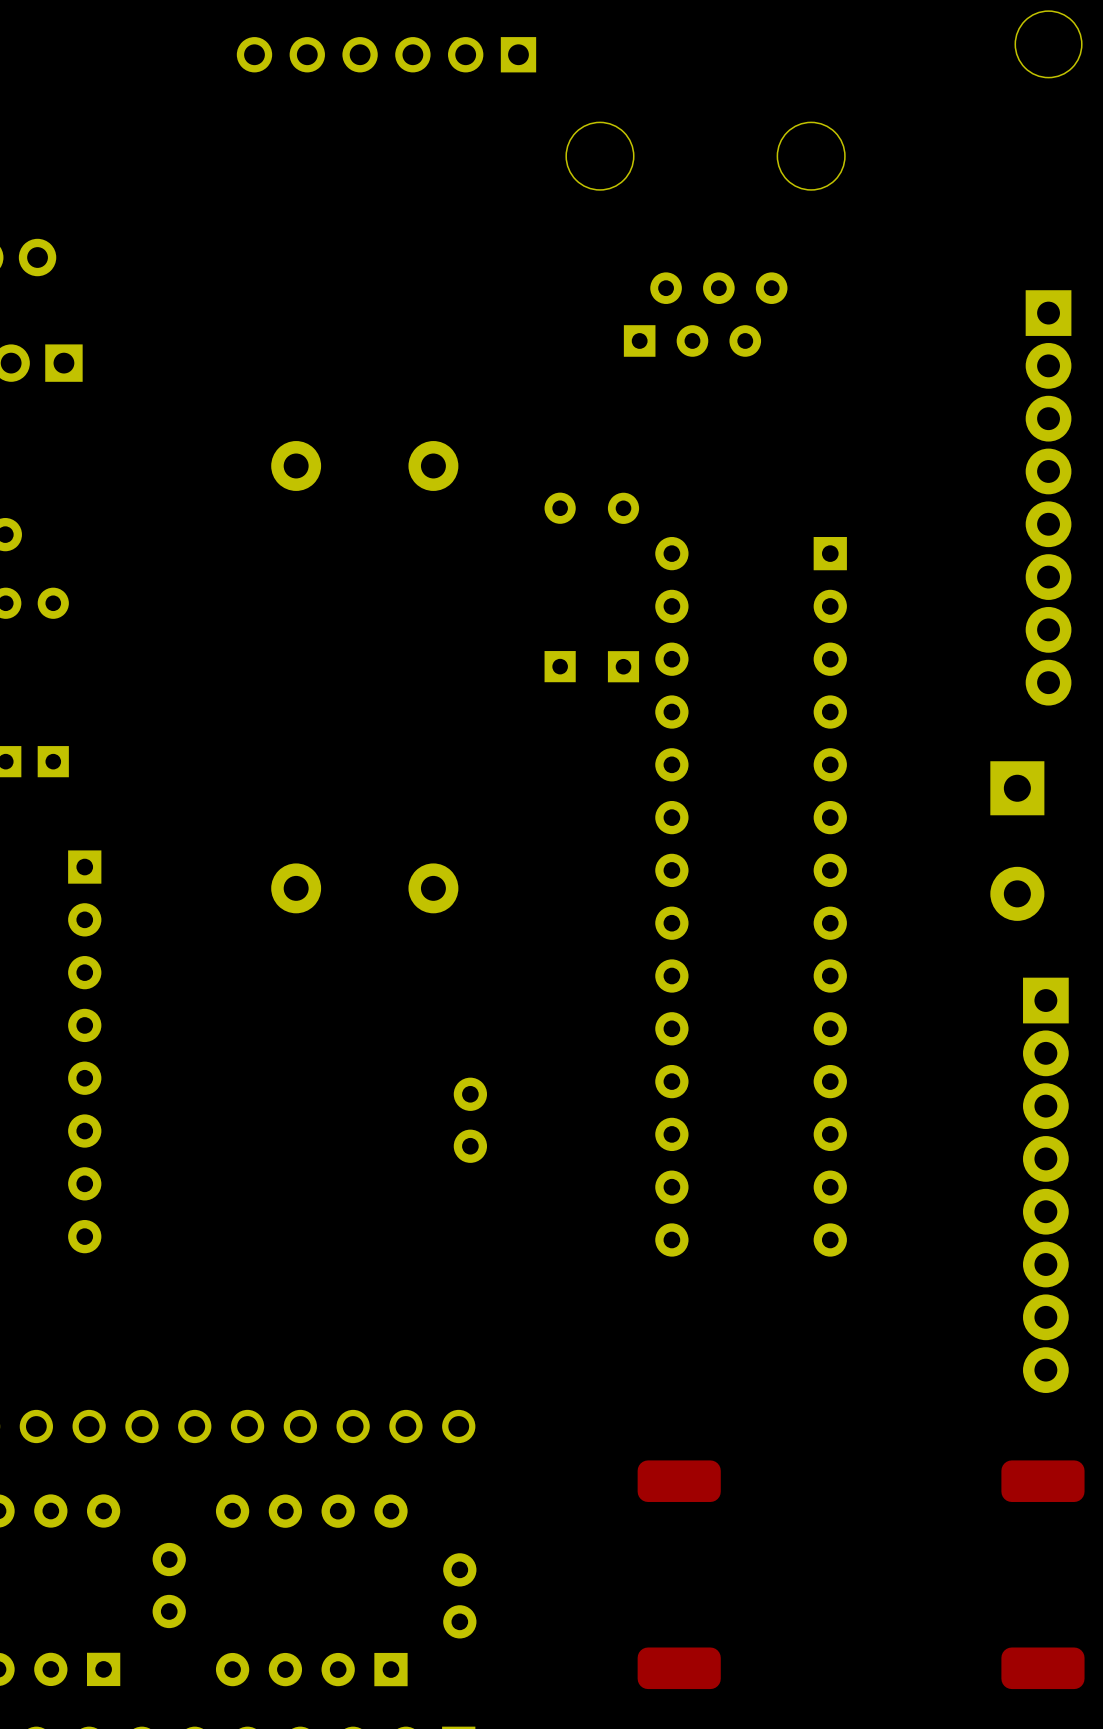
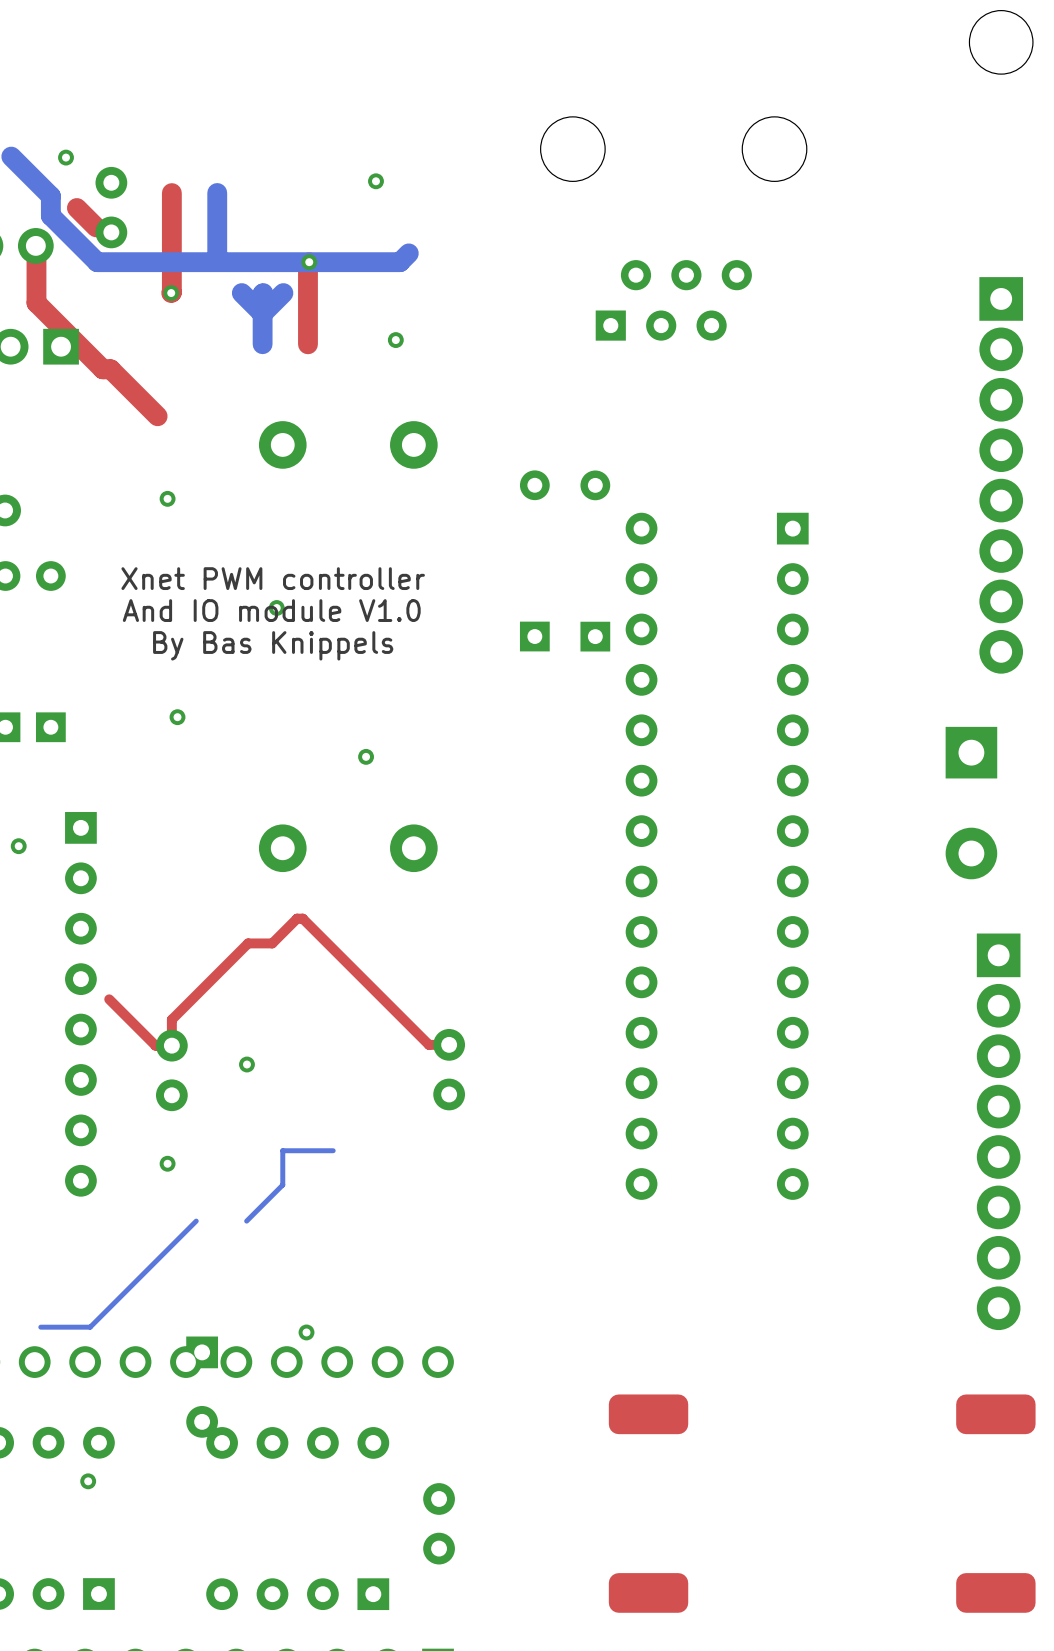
part: (386, 54) -> none
bottom track: none -> (11, 156) (50, 196) (50, 215) (97, 262) (400, 262) (408, 253)
via: none -> (66, 157)
via: none -> (375, 181)
top track: none -> (171, 193) (171, 293)
bottom track: none -> (217, 192) (217, 258) (221, 262)
top track: none -> (76, 208) (96, 227)
part: none -> (111, 207)
top track: none -> (36, 257) (36, 302) (102, 369) (110, 369) (157, 416)
top track: none -> (309, 262) (307, 344)
via: none -> (309, 262)
via: none -> (171, 293)
bottom track: none -> (263, 293) (262, 344)
bottom track: none -> (283, 293) (262, 313) (241, 293)
via: none -> (395, 340)
via: none -> (167, 498)
text: none -> Xnet PWM controller (273, 578)
via: none -> (276, 608)
text: none -> And IO module V1.0 (271, 610)
text: none -> By Bas Knippels (273, 645)
via: none -> (177, 717)
via: none -> (366, 756)
via: none -> (18, 846)
top track: none -> (109, 999) (155, 1045) (171, 1045) (171, 1019) (248, 943) (272, 943) (297, 918) (302, 918) (428, 1044) (449, 1044)
via: none -> (246, 1064)
part: none -> (171, 1070)
bottom track: none -> (333, 1150) (282, 1150) (282, 1184) (246, 1221)
via: none -> (167, 1163)
bottom track: none -> (196, 1221) (90, 1327) (40, 1327)
via: none -> (306, 1332)
part: none -> (202, 1387)
via: none -> (88, 1481)
part: (169, 1585) -> none

